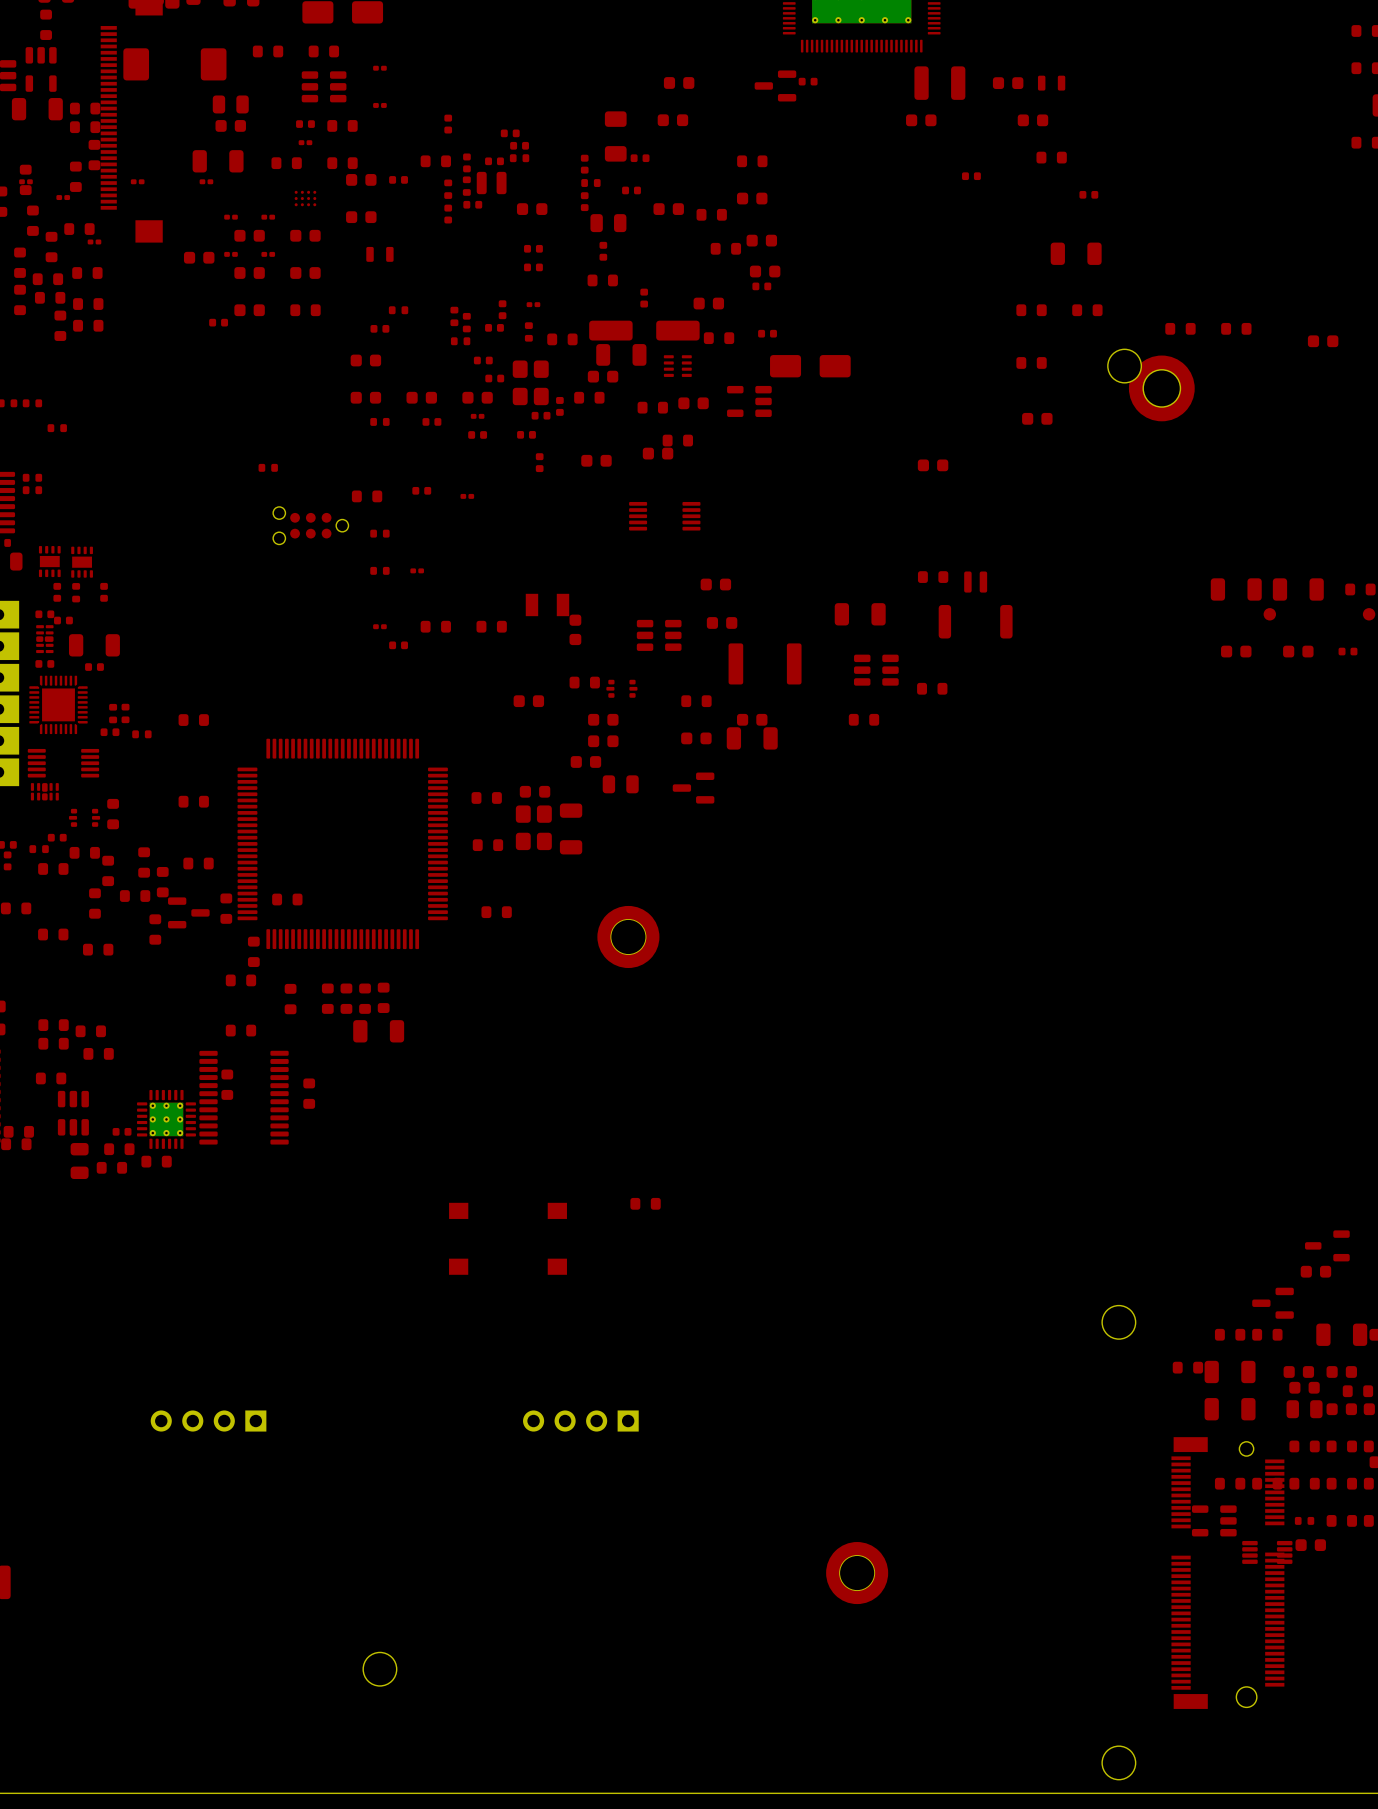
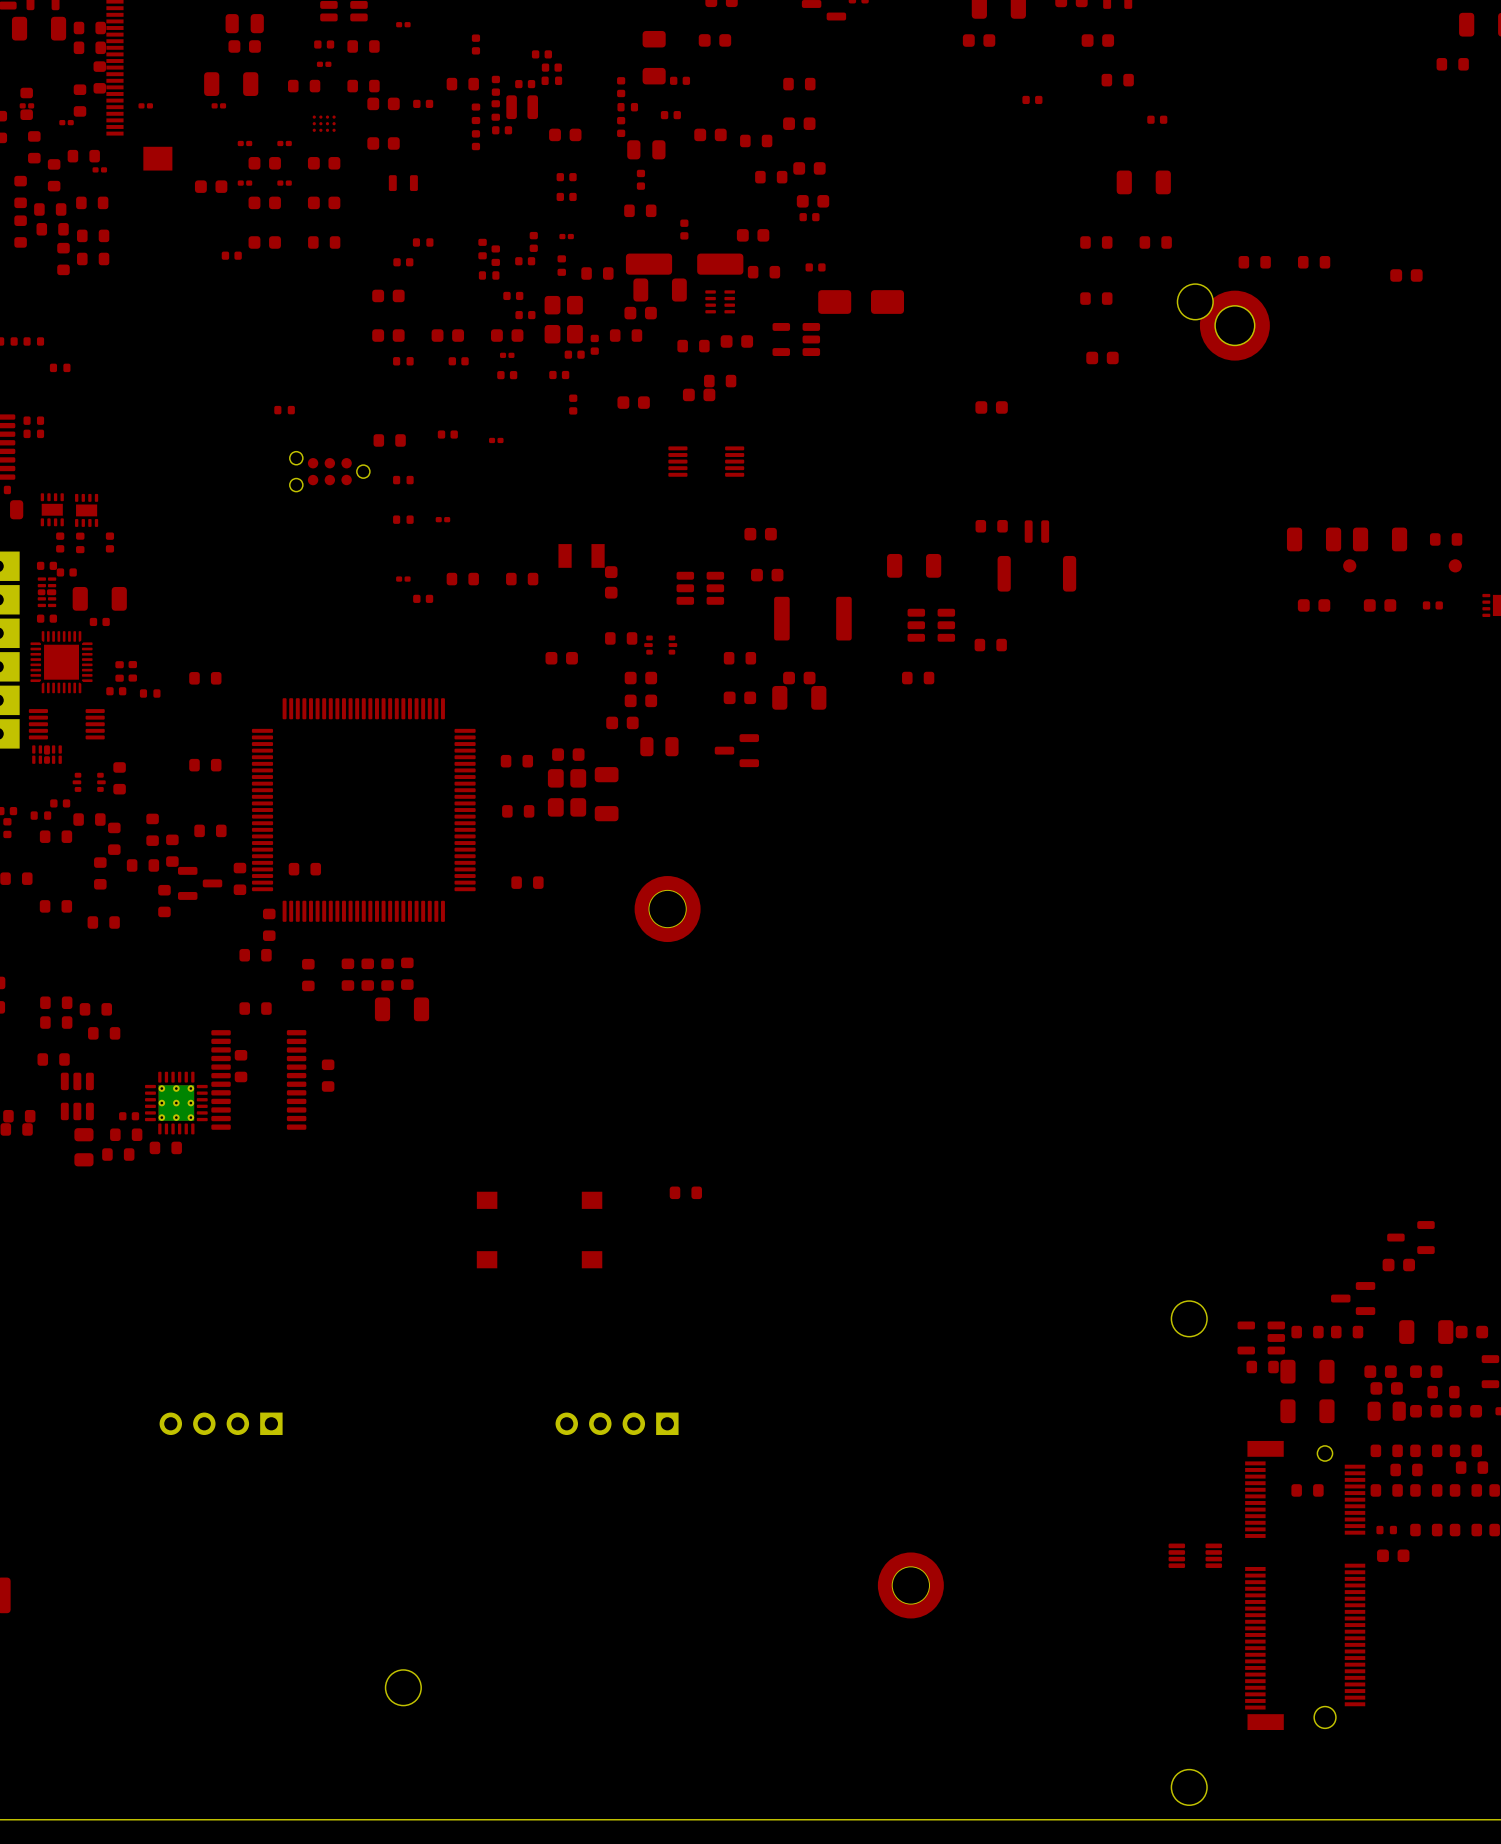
part position: (1267, 1483) -> (1406, 1469)
part position: (1214, 1520) -> (1261, 1337)
part position: (1267, 1552) -> (1195, 1555)

